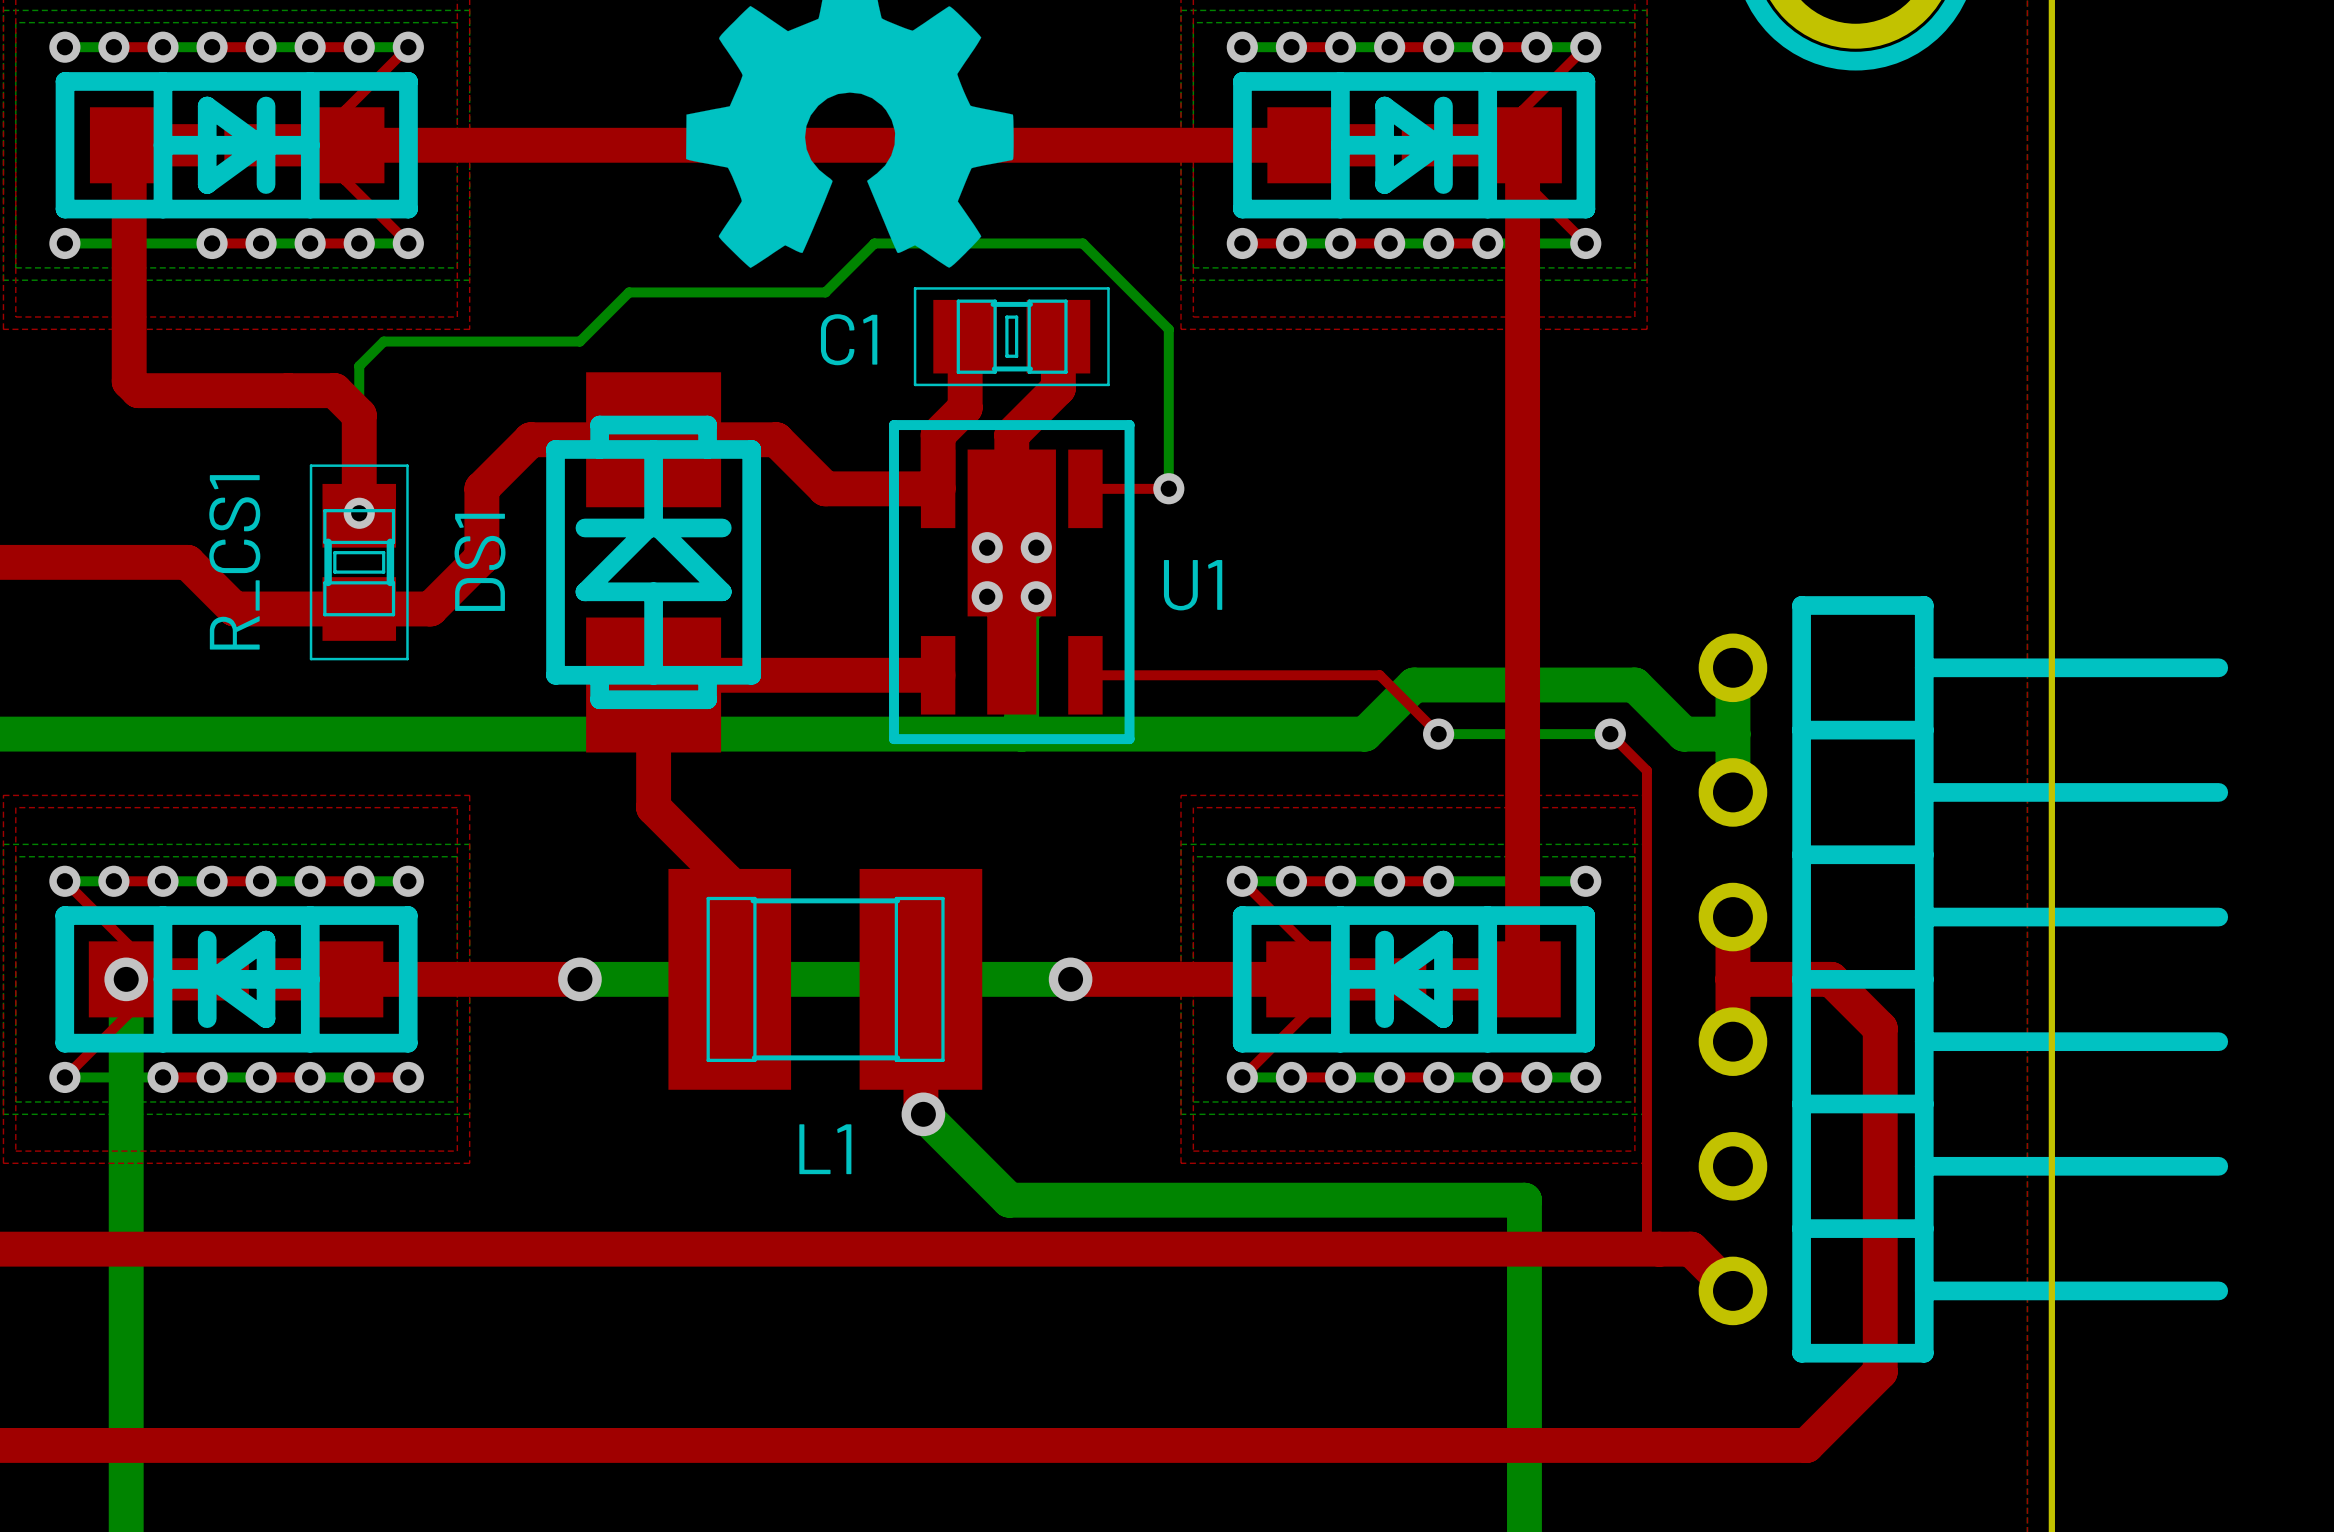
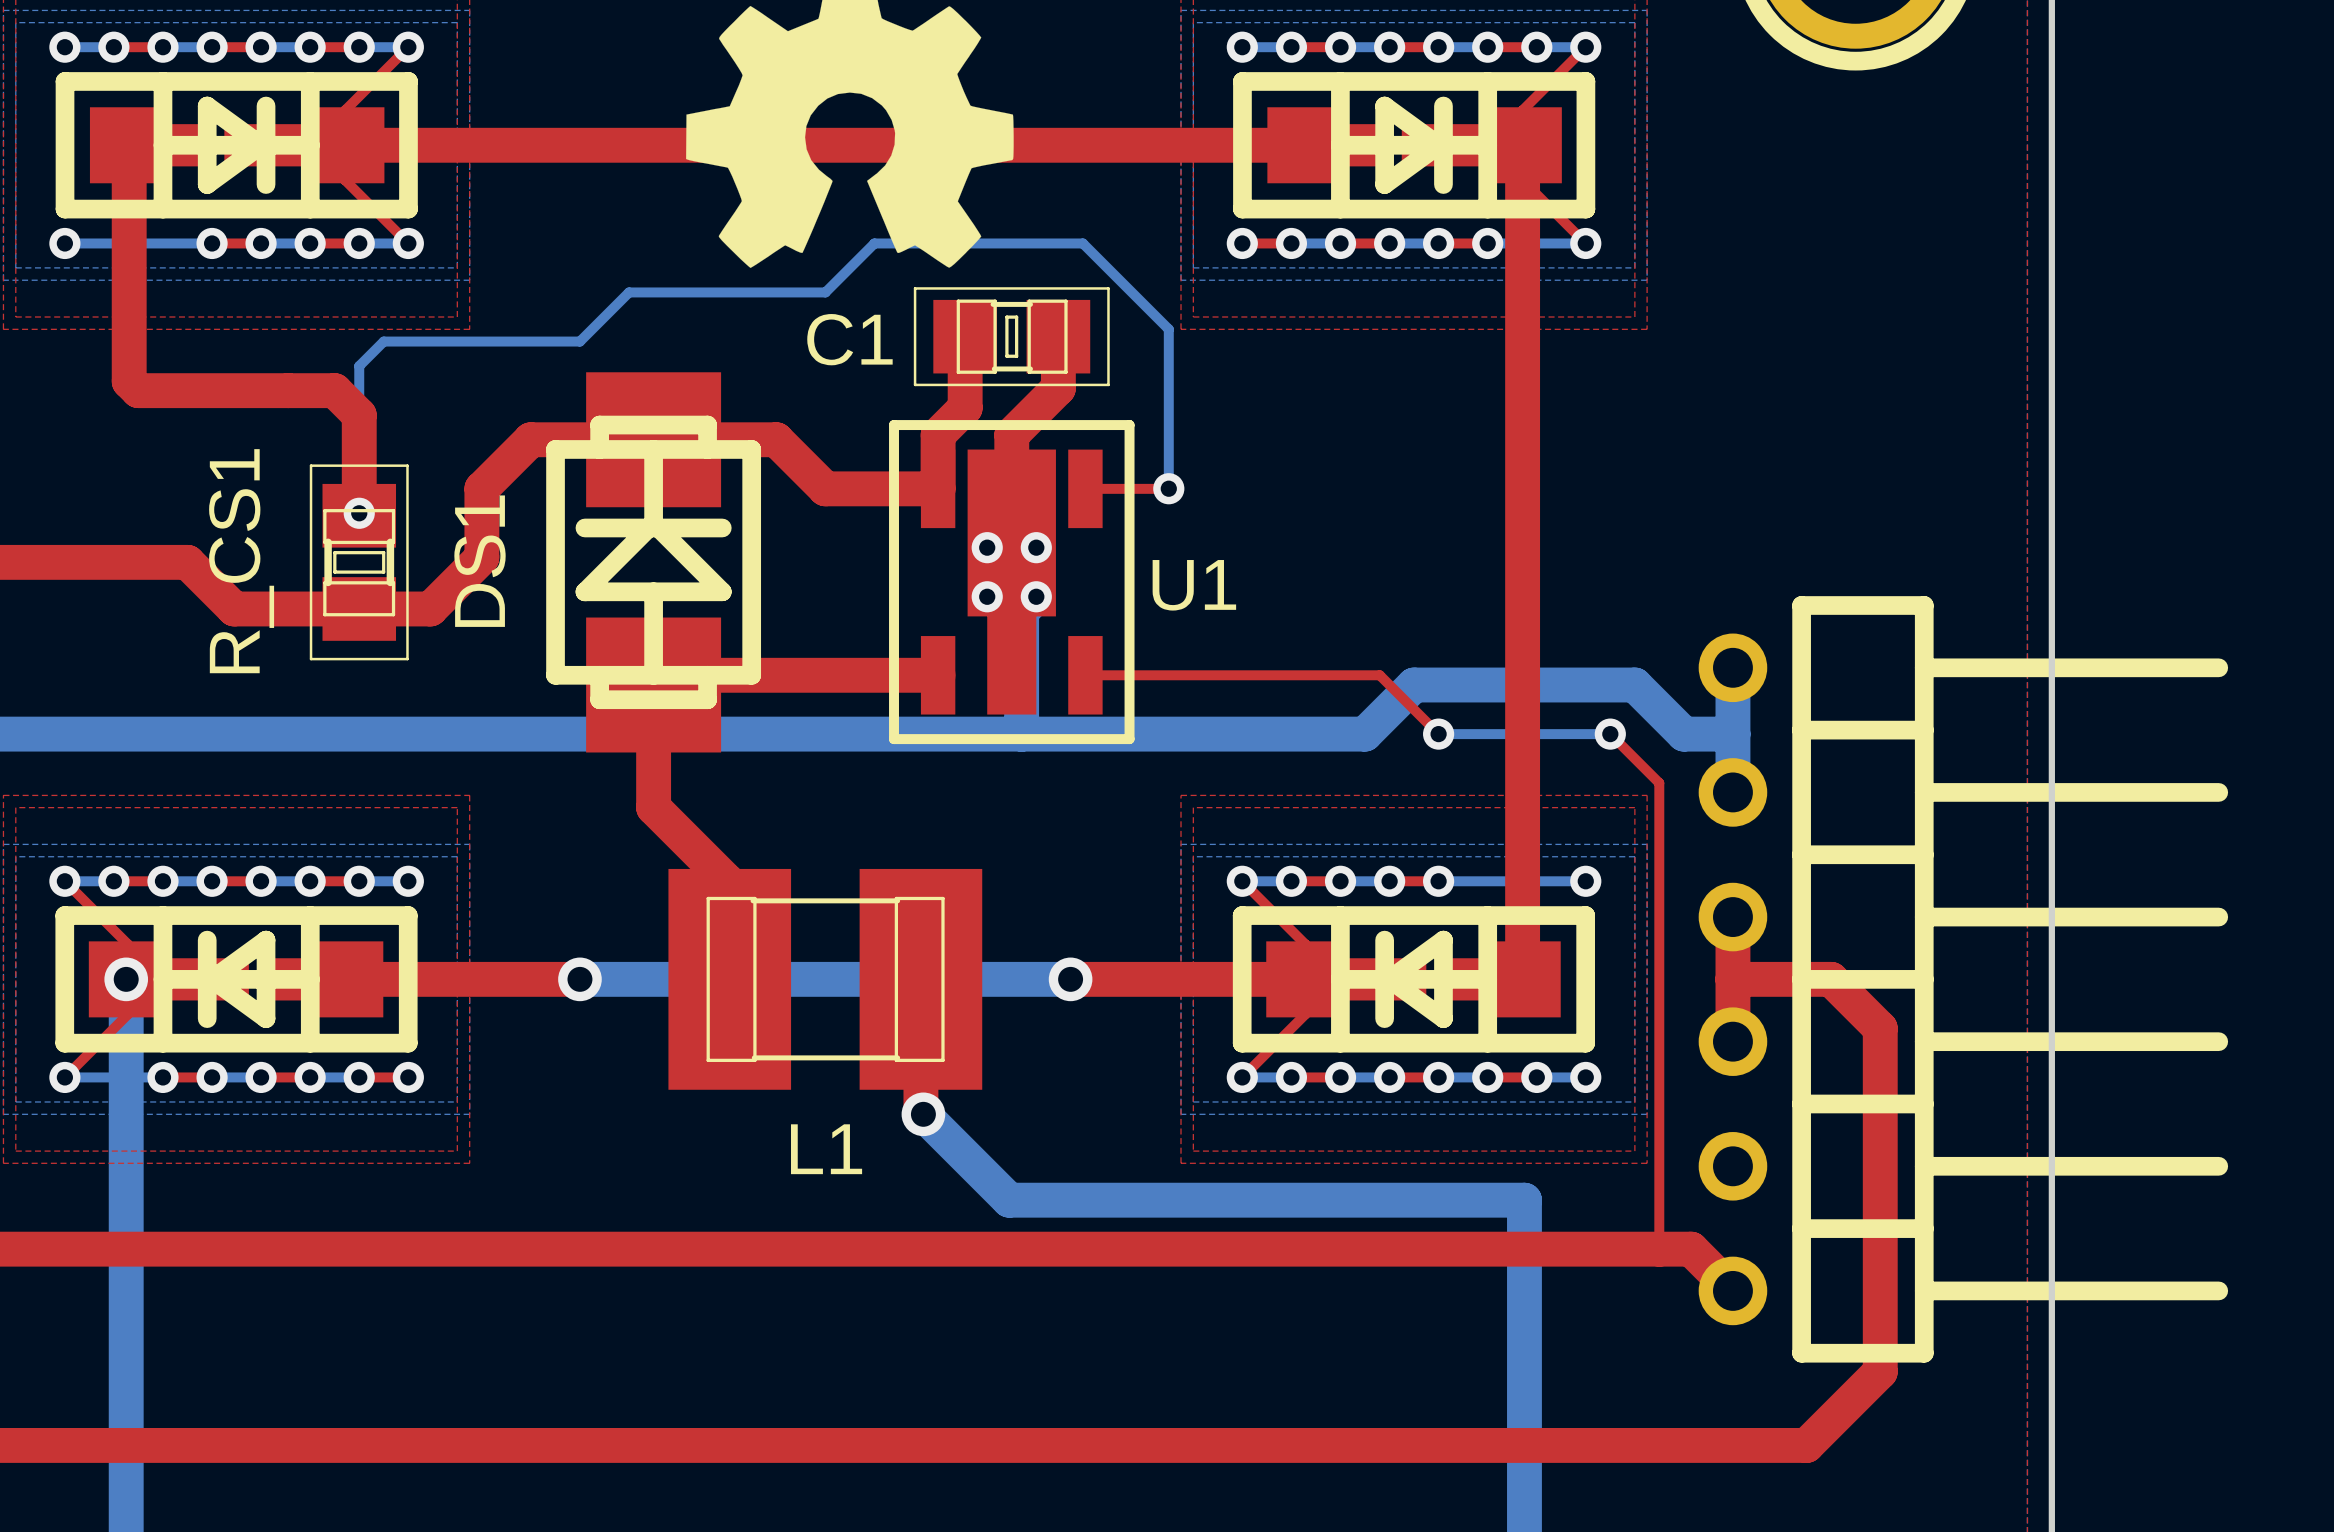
top track: (1646, 770) (1646, 1249) (1659, 1249) -> (1646, 770) (1659, 783) (1659, 1249)

